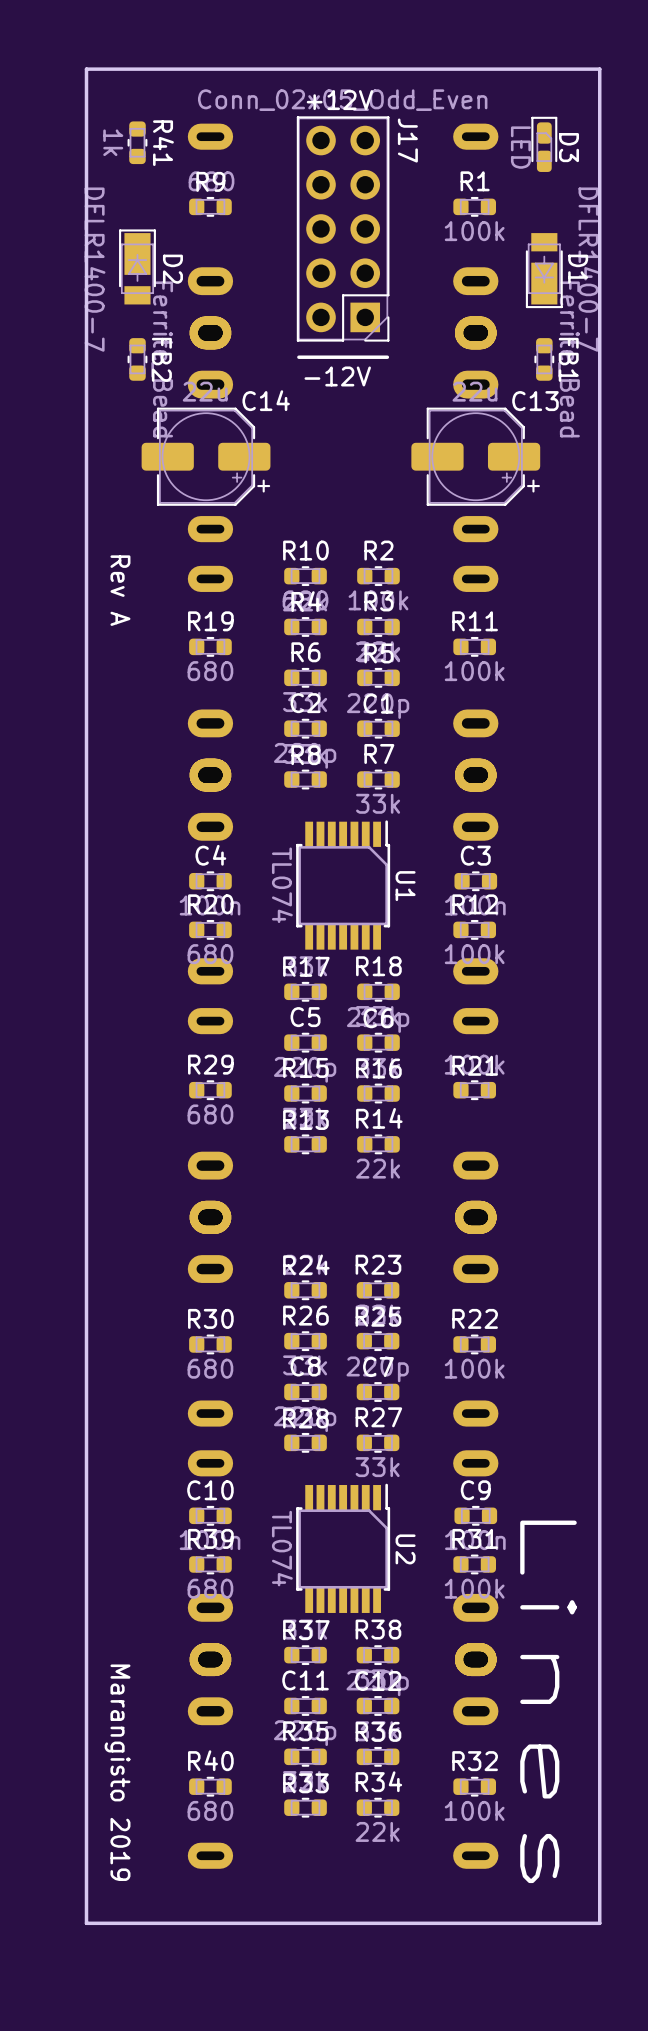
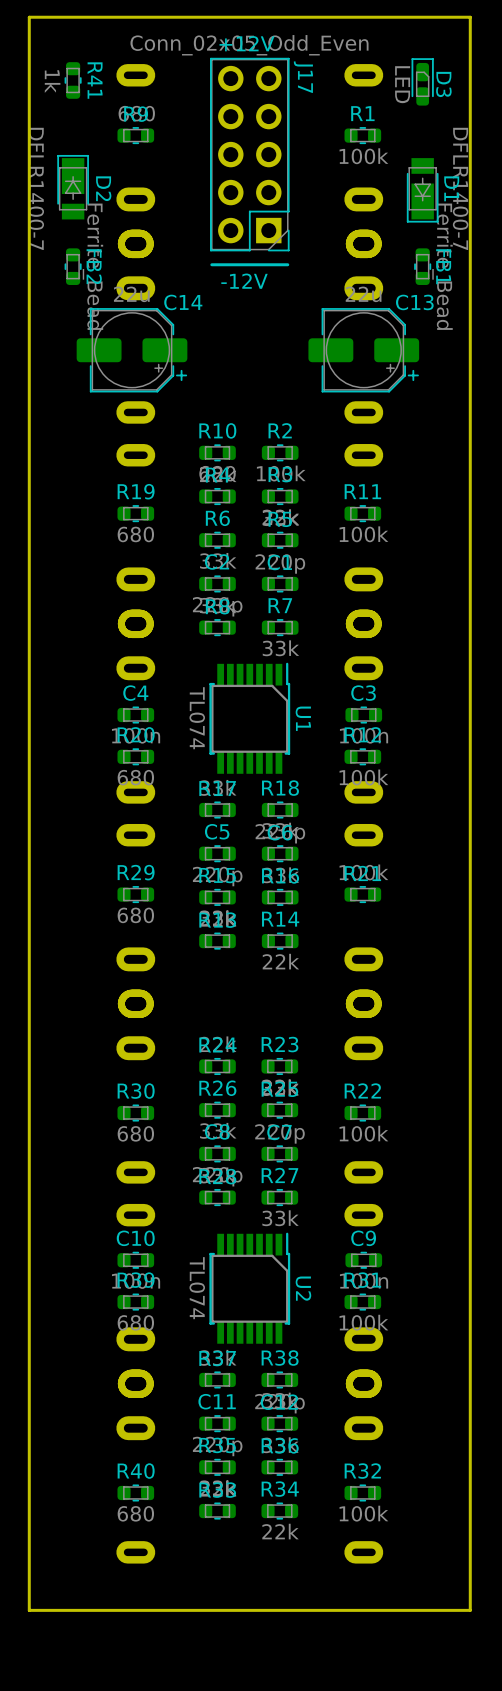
text: Rev A (120, 590) -> none
text: Lines (548, 1701) -> none
text: Marangisto 2019 (117, 1772) -> none

